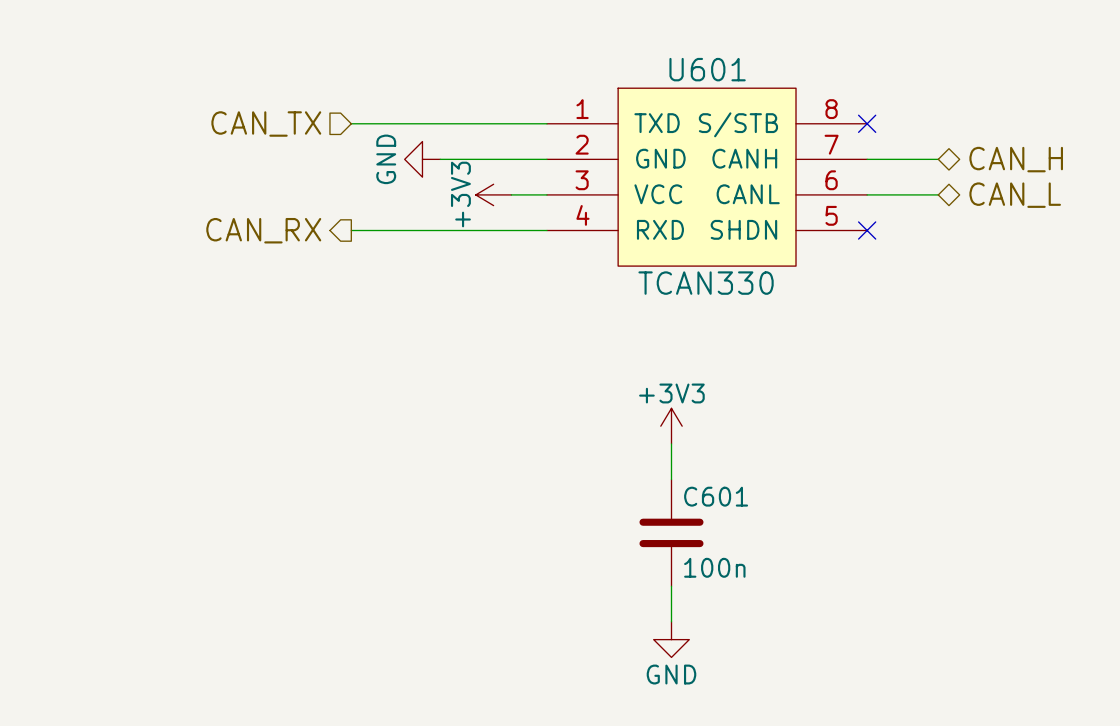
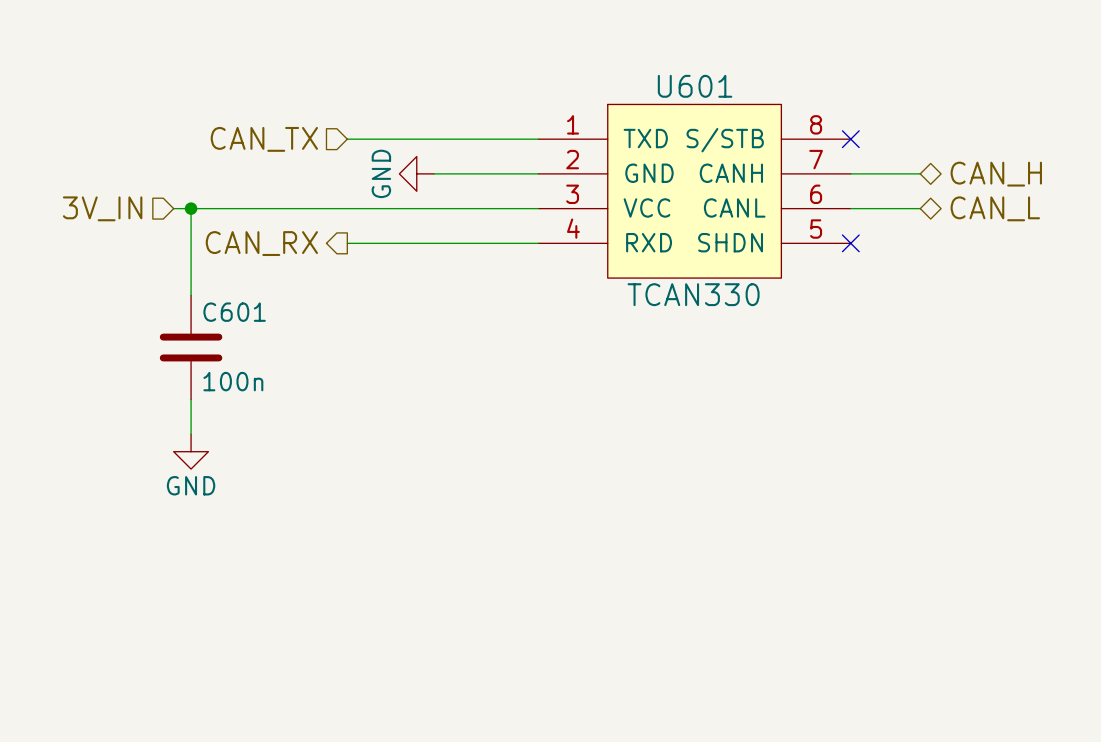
wire: none -> (173, 208) (503, 208)
wire: none -> (191, 208) (191, 295)
junction: none -> (191, 208)
power symbol: +3V3 (493, 194) -> none
hierarchical label: none -> 3V_IN (102, 208)
wire: none -> (191, 399) (191, 434)
power symbol: +3V3 (671, 426) -> none
power symbol: none -> GND (191, 451)
wire: (671, 443) (671, 479) -> none
C601 position: (671, 532) -> (191, 347)
wire: (671, 586) (671, 621) -> none
power symbol: GND (671, 639) -> none

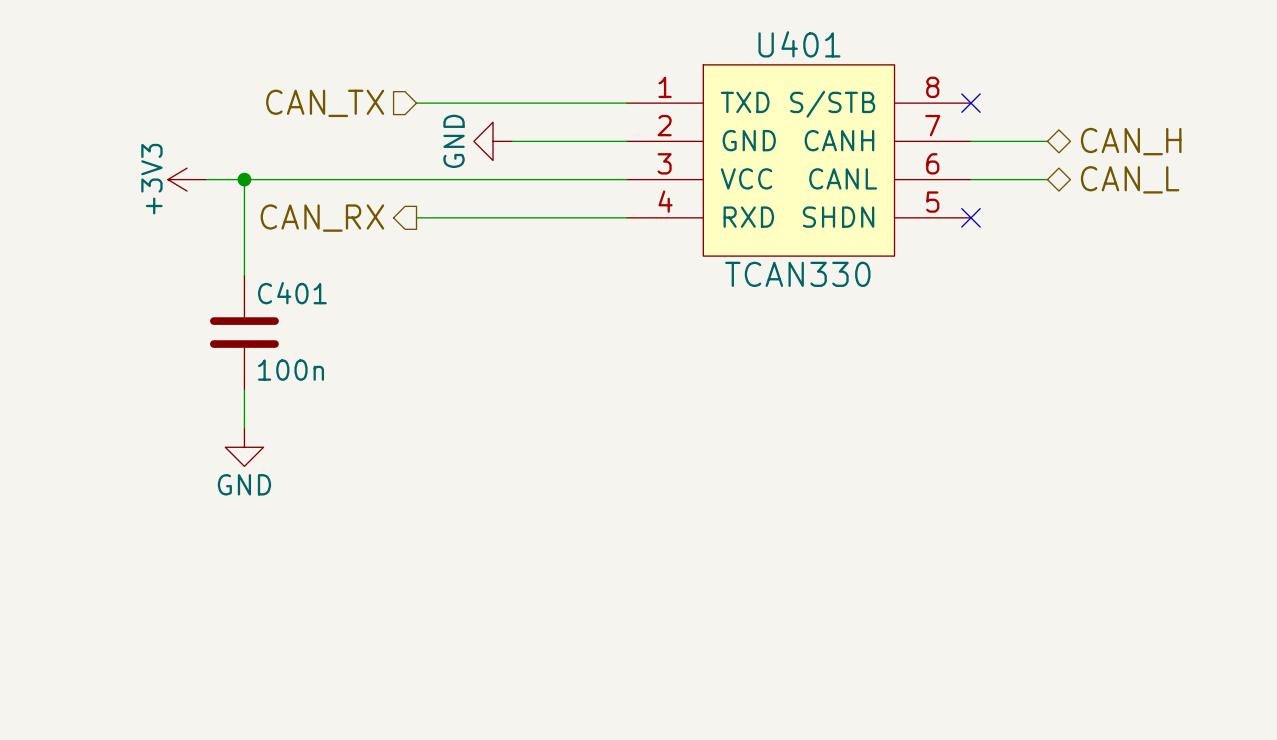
U601 name: U601 (695, 86) -> U401 (799, 44)
hierarchical label: 3V_IN (102, 208) -> none
power symbol: none -> +3V3 (187, 179)
wire: none -> (206, 179) (225, 179)
C601 name: C601 (234, 312) -> C401 (292, 293)

